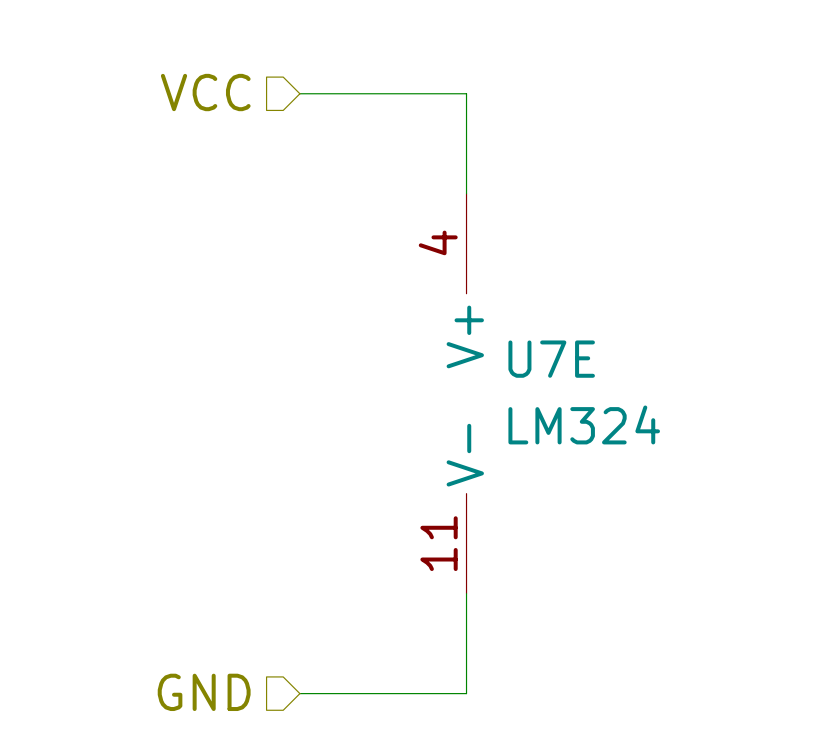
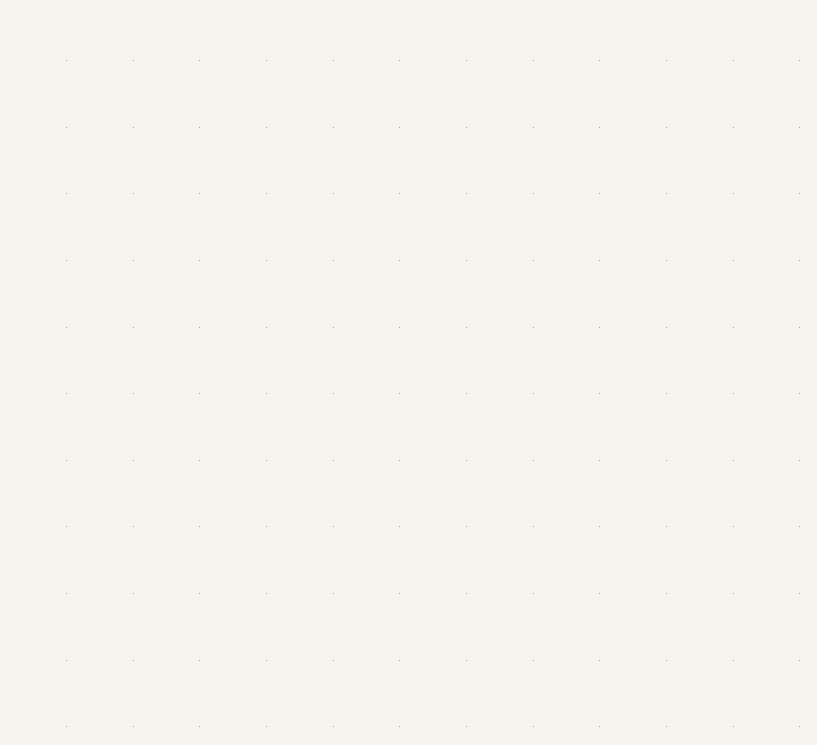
hierarchical label: VCC (205, 92) -> none
wire: (299, 93) (466, 93) (466, 193) -> none
U7E: LM324 (466, 393) -> none
wire: (466, 593) (466, 693) (299, 693) -> none
hierarchical label: GND (204, 692) -> none

